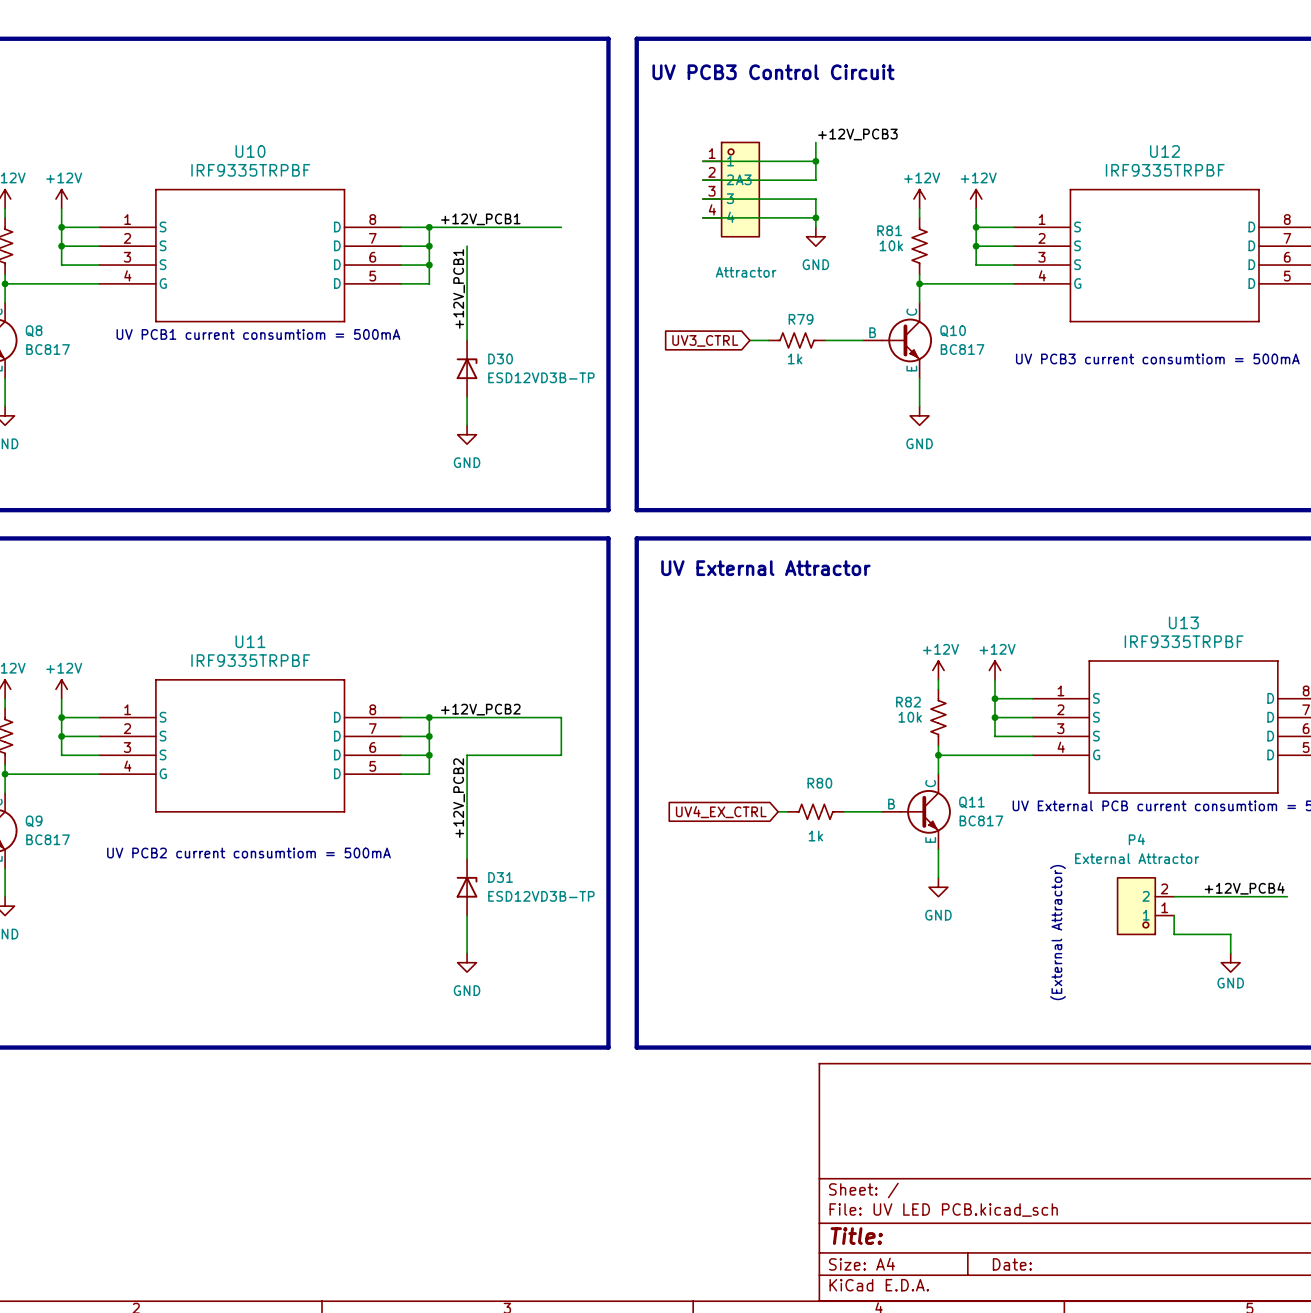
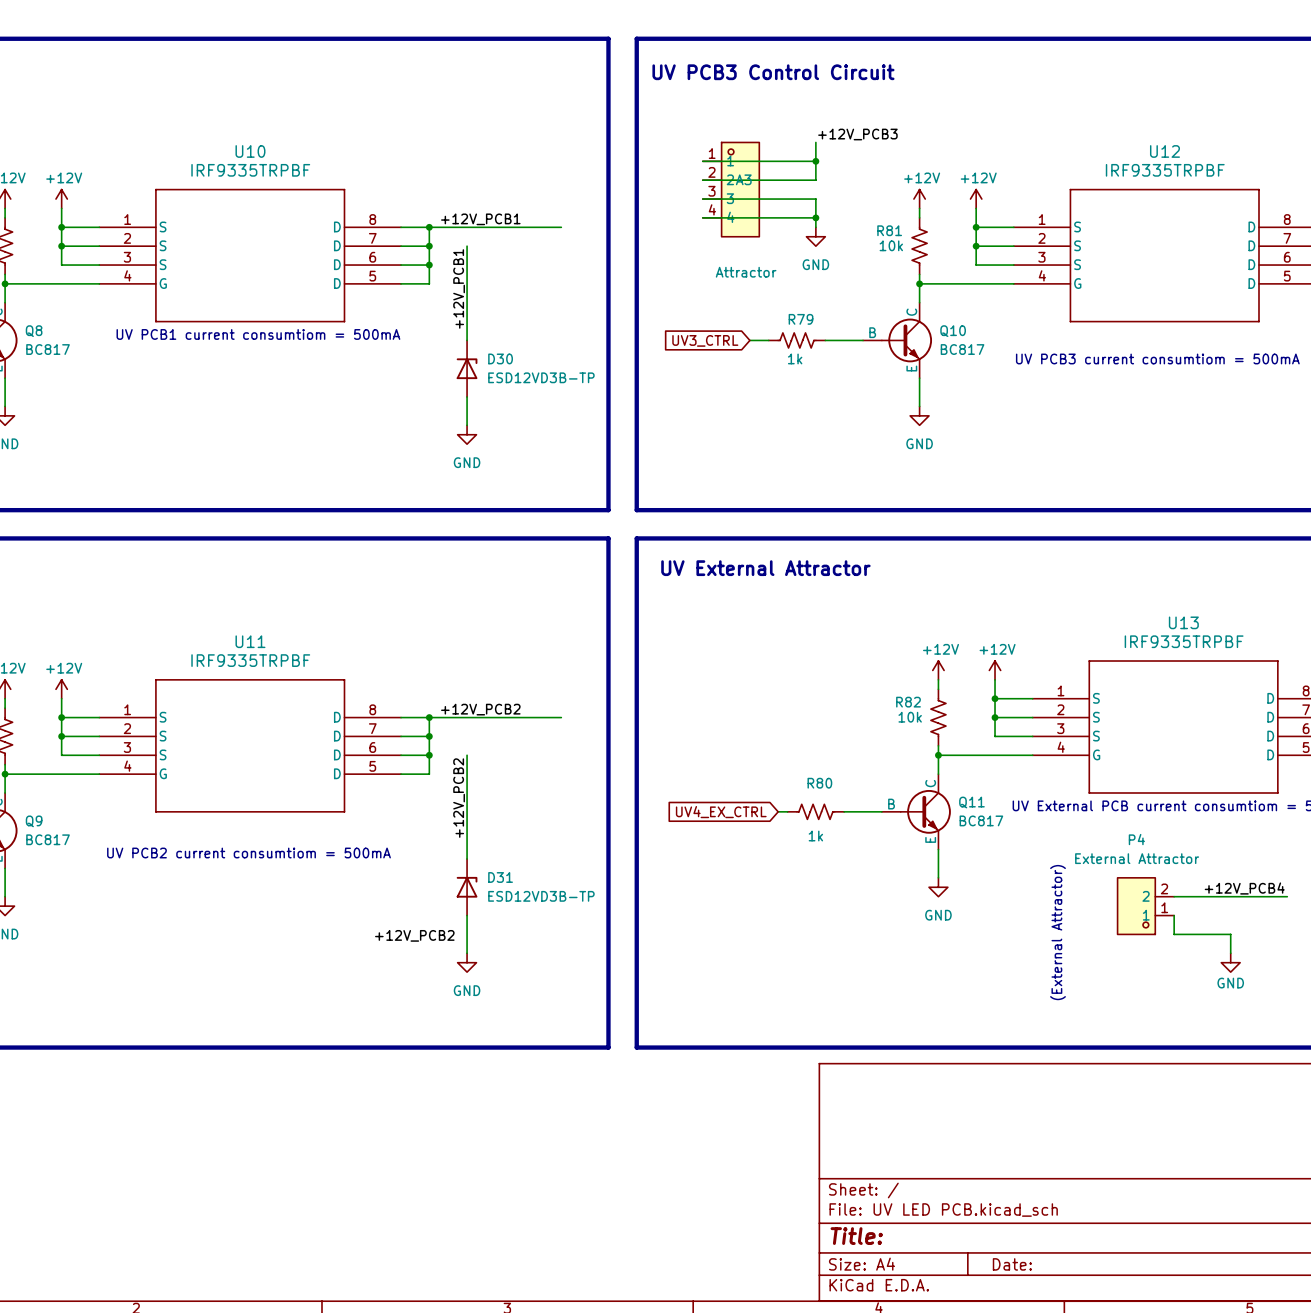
wire: (561, 717) (561, 755) (467, 755) -> none
label: none -> +12V_PCB2 (414, 935)

